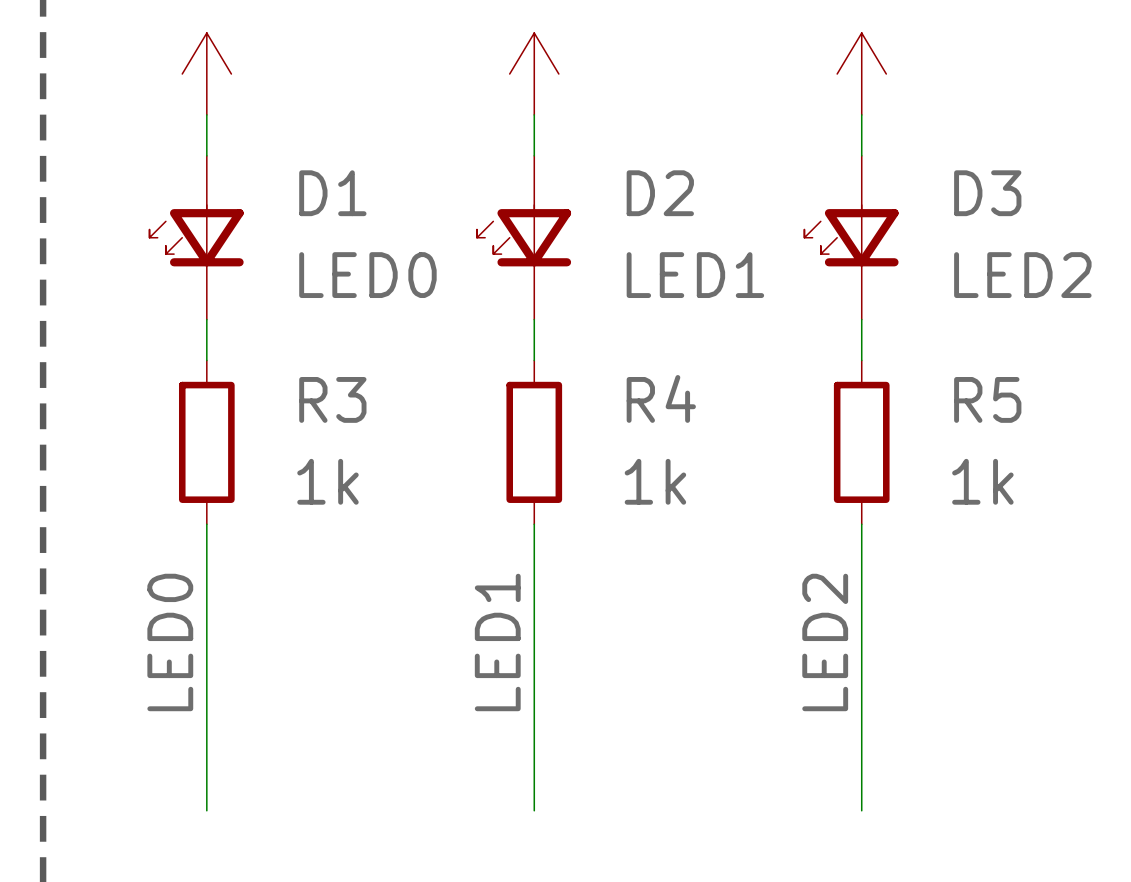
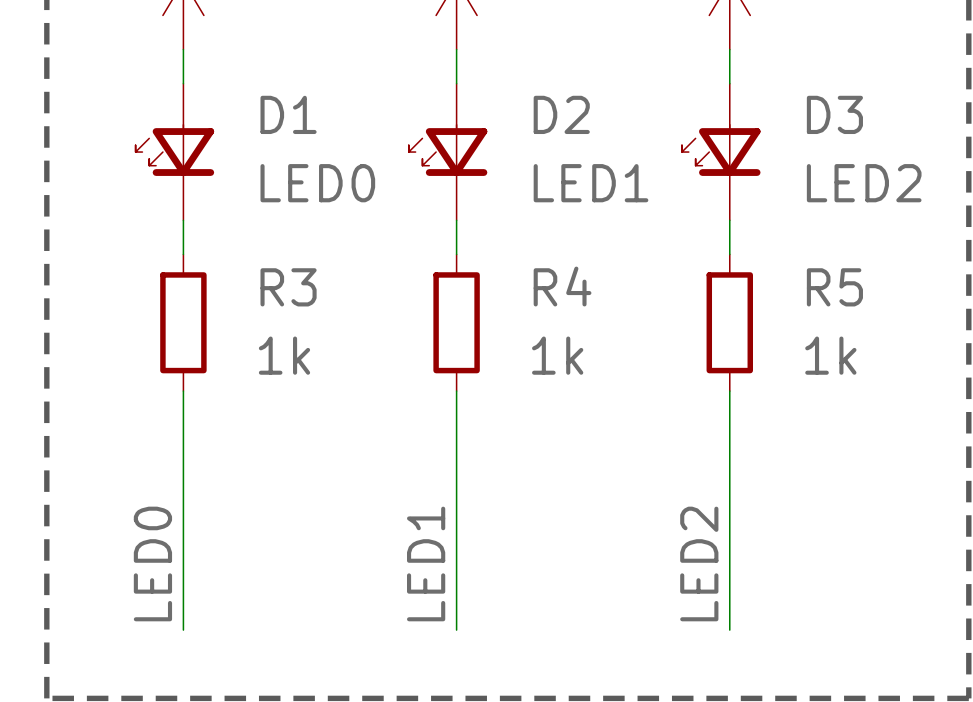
label position: LED0 (170, 642) -> LED0 (152, 563)
label position: LED1 (497, 642) -> LED1 (426, 563)
label position: LED2 (825, 642) -> LED2 (699, 563)

